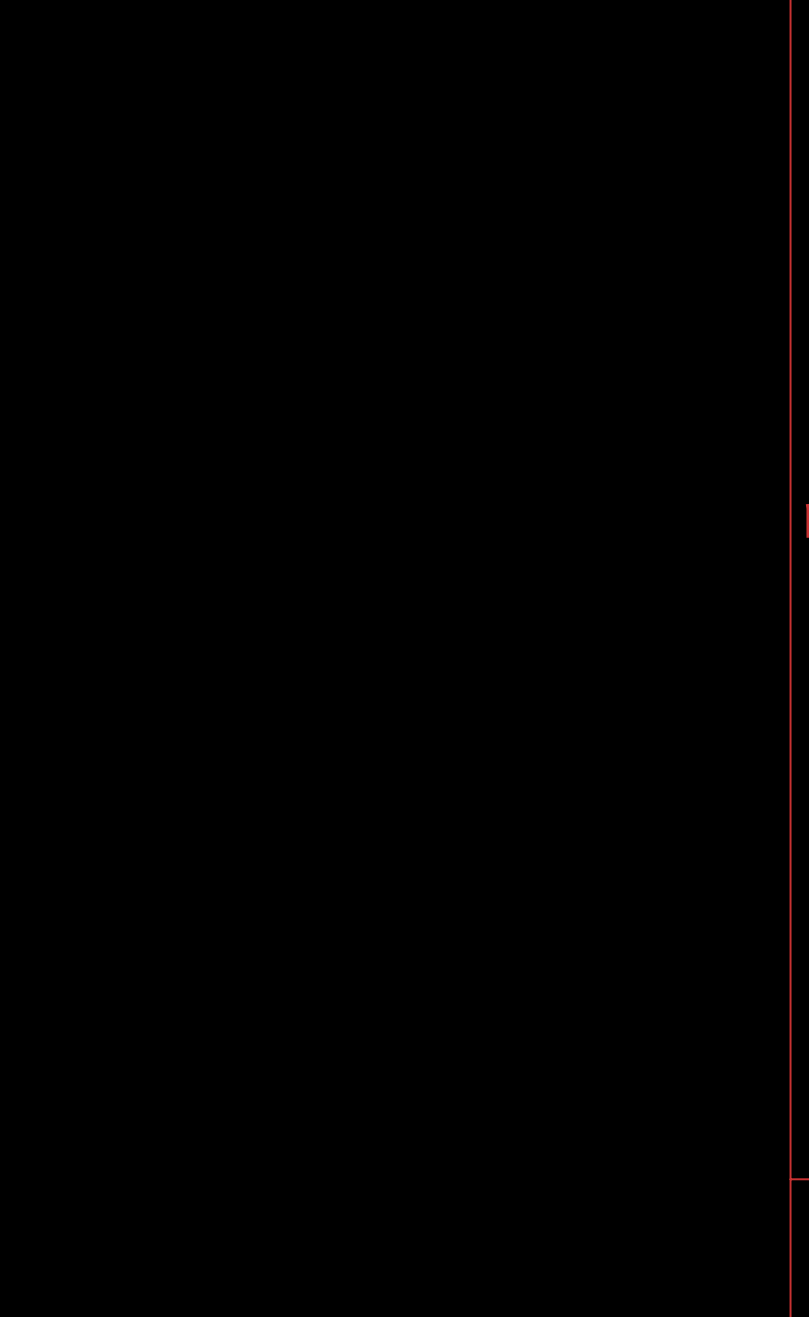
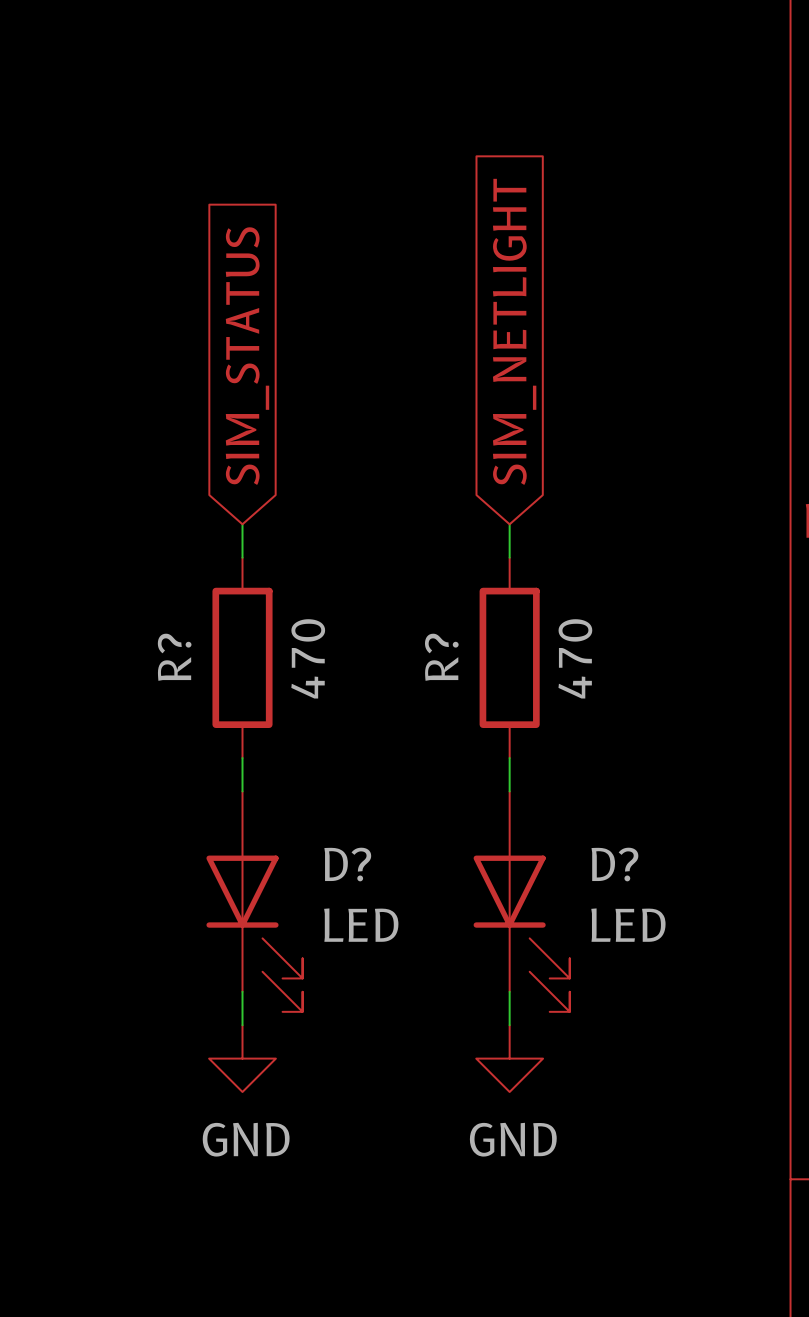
global label: none -> SIM_NETLIGHT (514, 331)
global label: none -> SIM_STATUS (247, 356)
wire: none -> (242, 524) (242, 557)
wire: none -> (509, 524) (509, 557)
R?: none -> 470 (242, 657)
R?: none -> 470 (509, 657)
wire: none -> (242, 758) (242, 791)
wire: none -> (509, 758) (509, 791)
D?: none -> LED (254, 901)
D?: none -> LED (521, 901)
wire: none -> (242, 991) (242, 1025)
wire: none -> (509, 991) (509, 1025)
power symbol: none -> GND (242, 1058)
power symbol: none -> GND (509, 1058)

